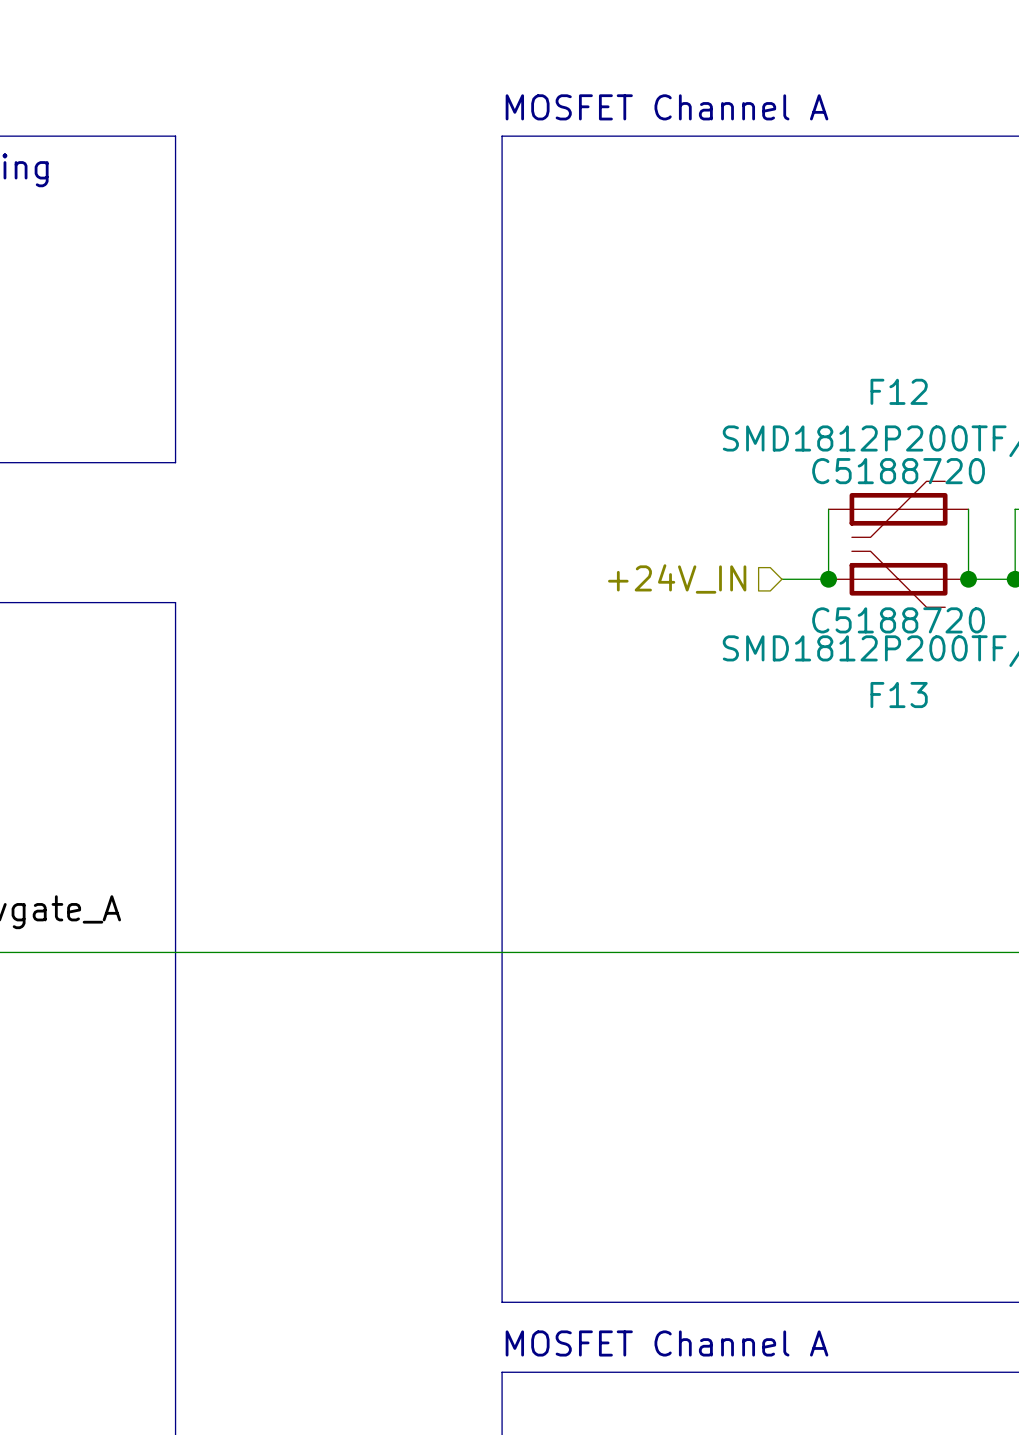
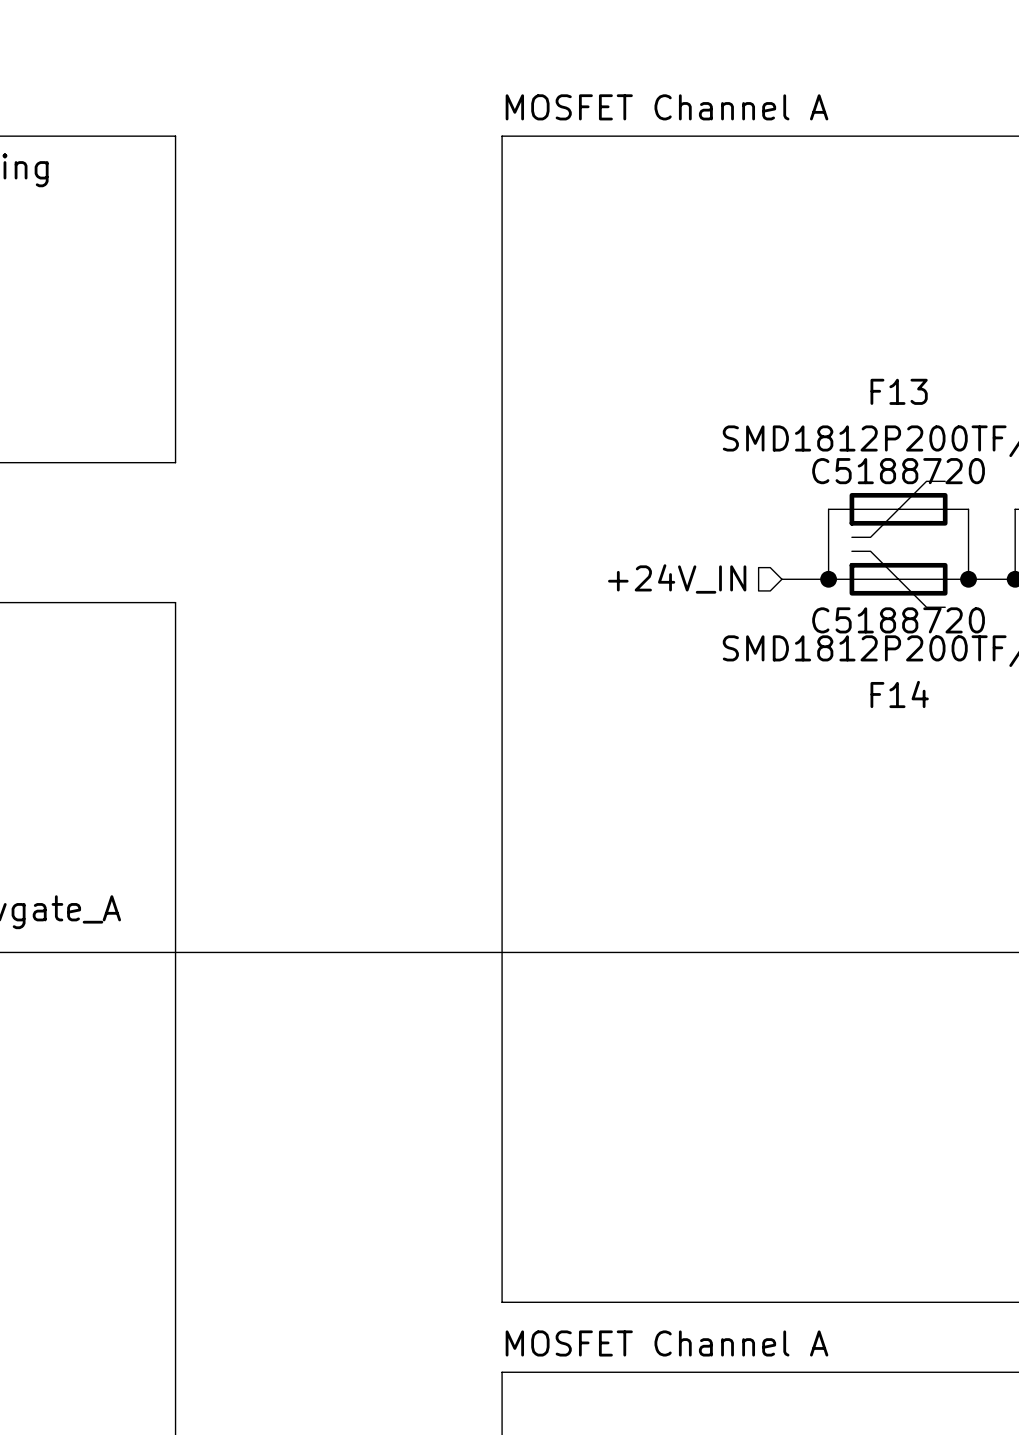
F12 name: F12 (899, 391) -> F13 (899, 391)
F13 name: F13 (899, 695) -> F14 (899, 694)

